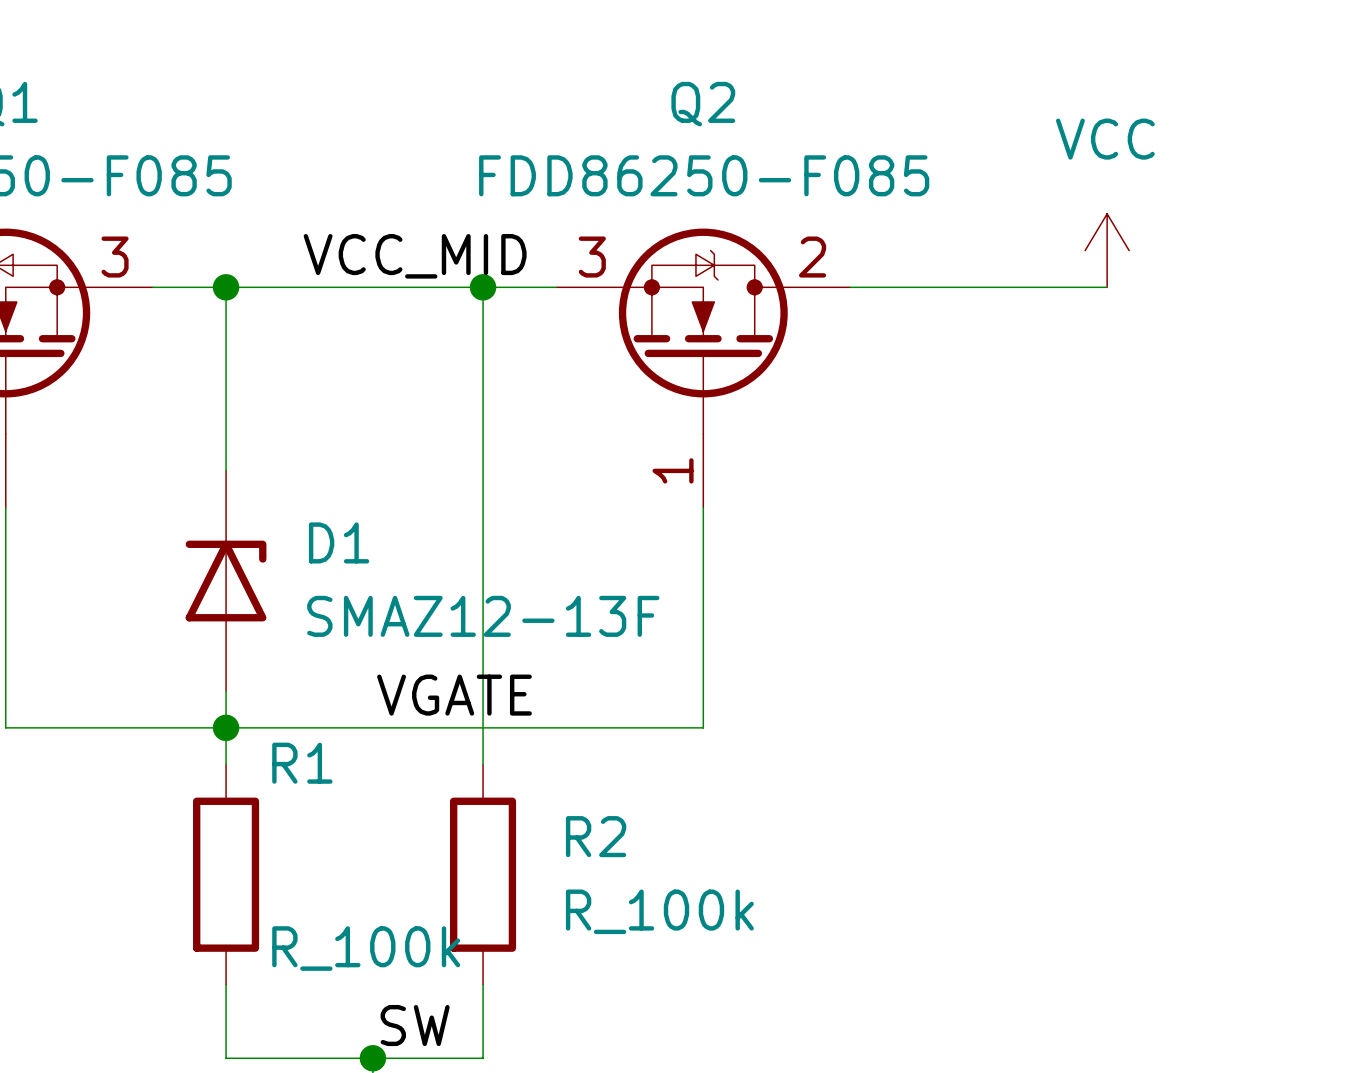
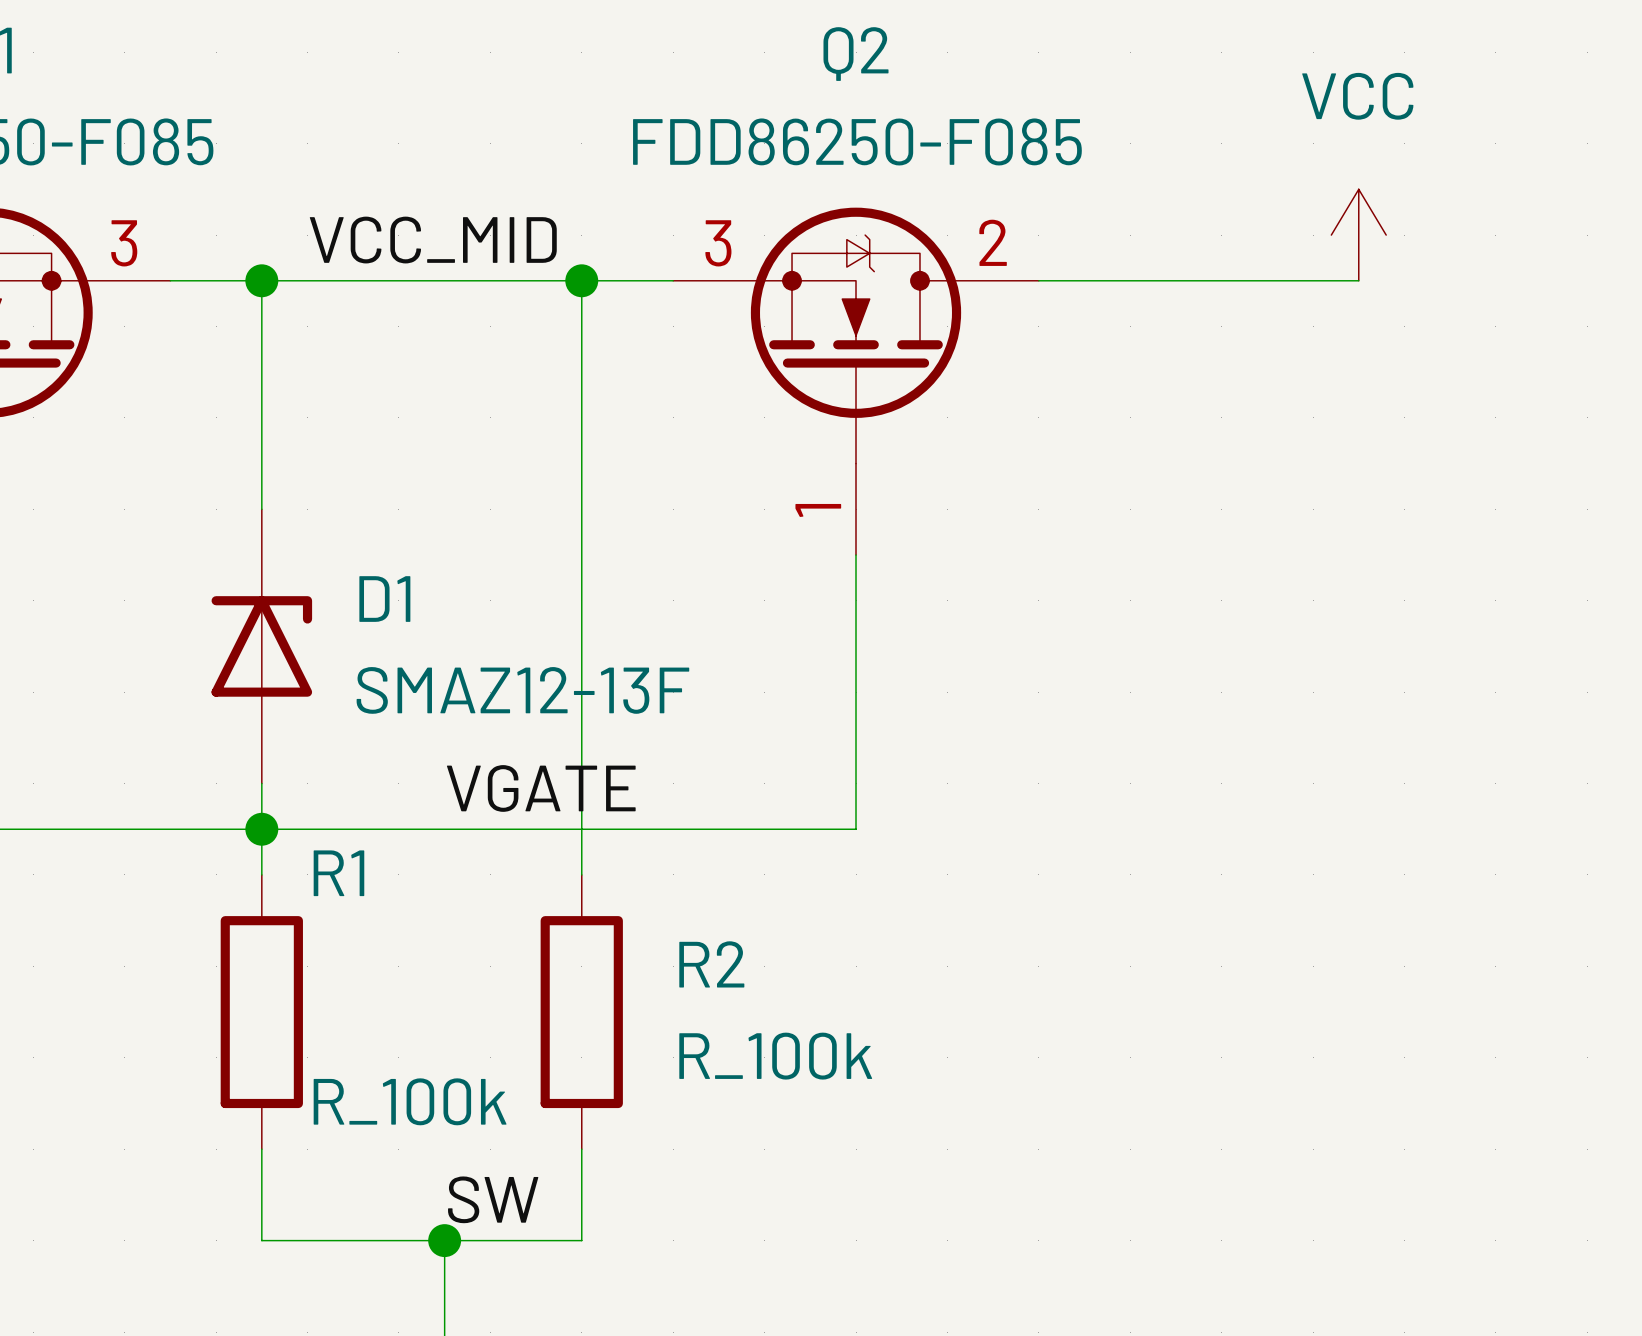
label position: VCC_MID (415, 256) -> VCC_MID (433, 240)

